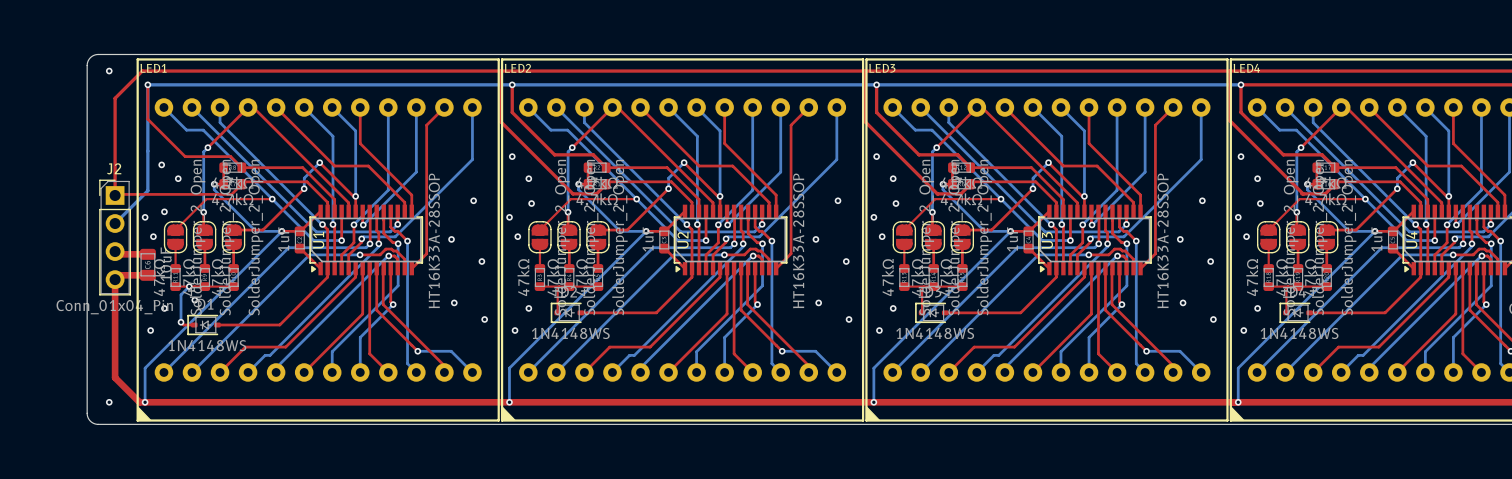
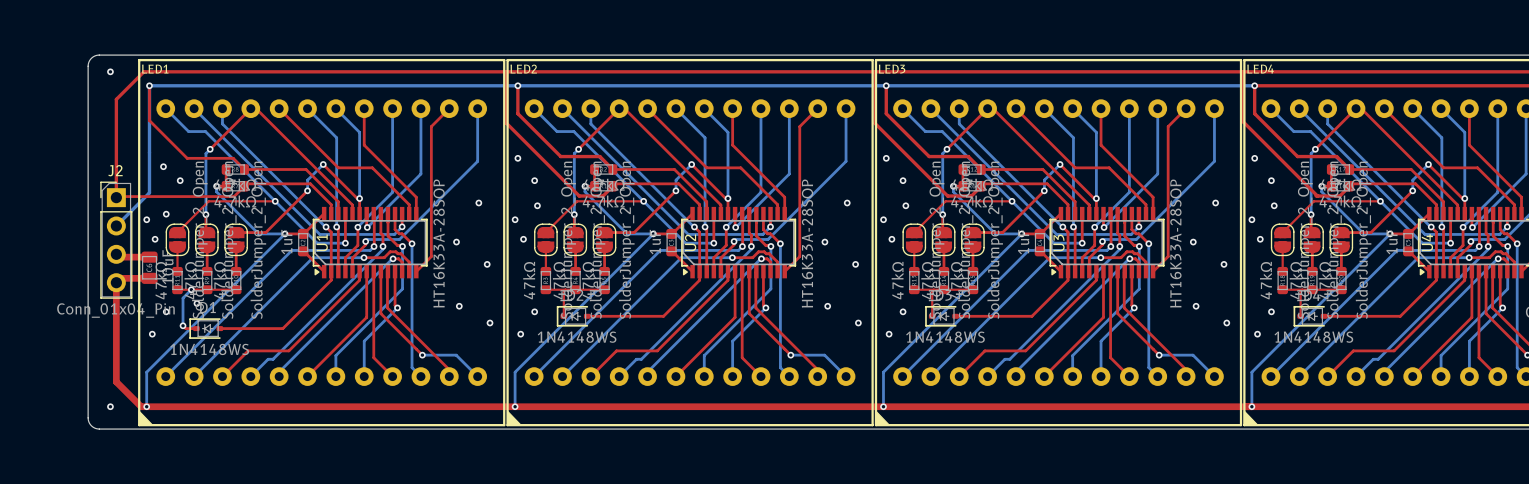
U1 value: HT16K33A-28SSOP (434, 240) -> HT16K33A-28SOP (439, 243)
U2 value: HT16K33A-28SSOP (798, 240) -> HT16K33A-28SOP (807, 243)
U3 value: HT16K33A-28SSOP (1163, 240) -> HT16K33A-28SOP (1175, 243)

